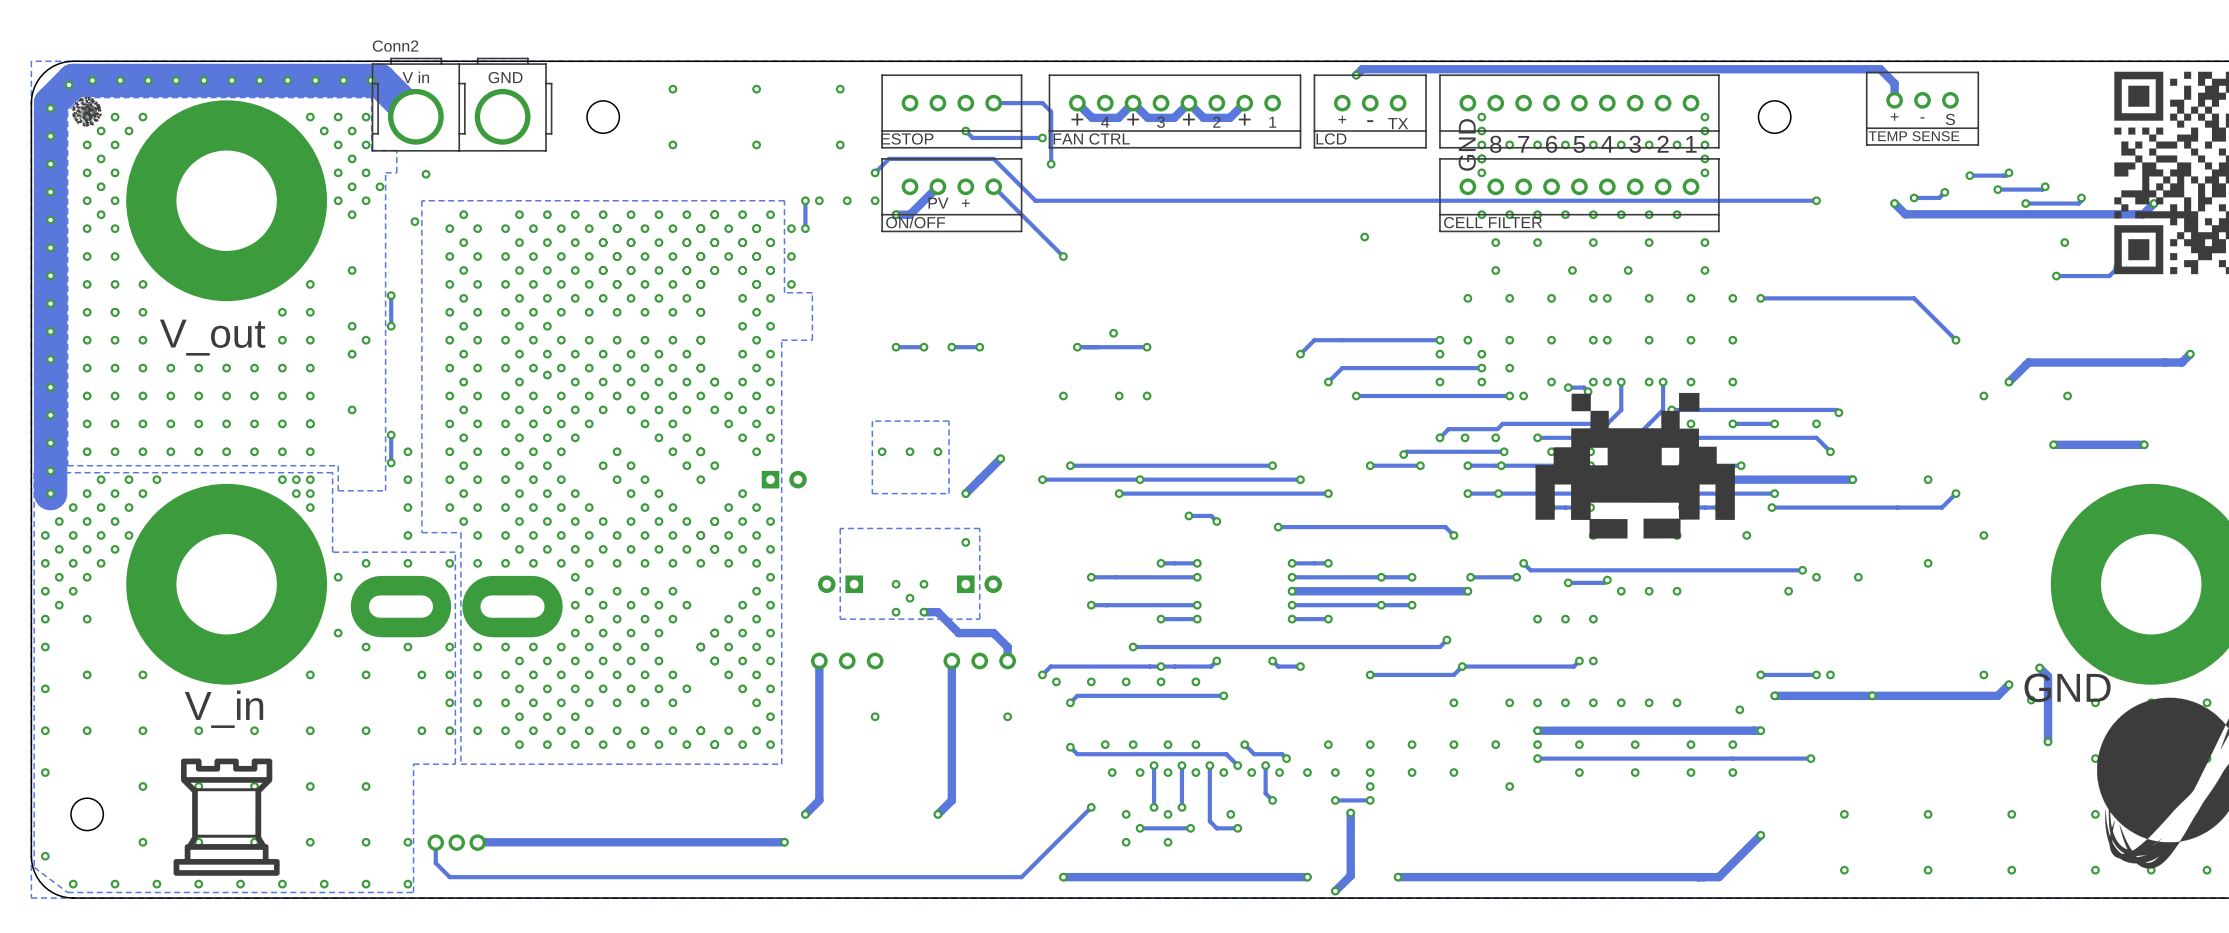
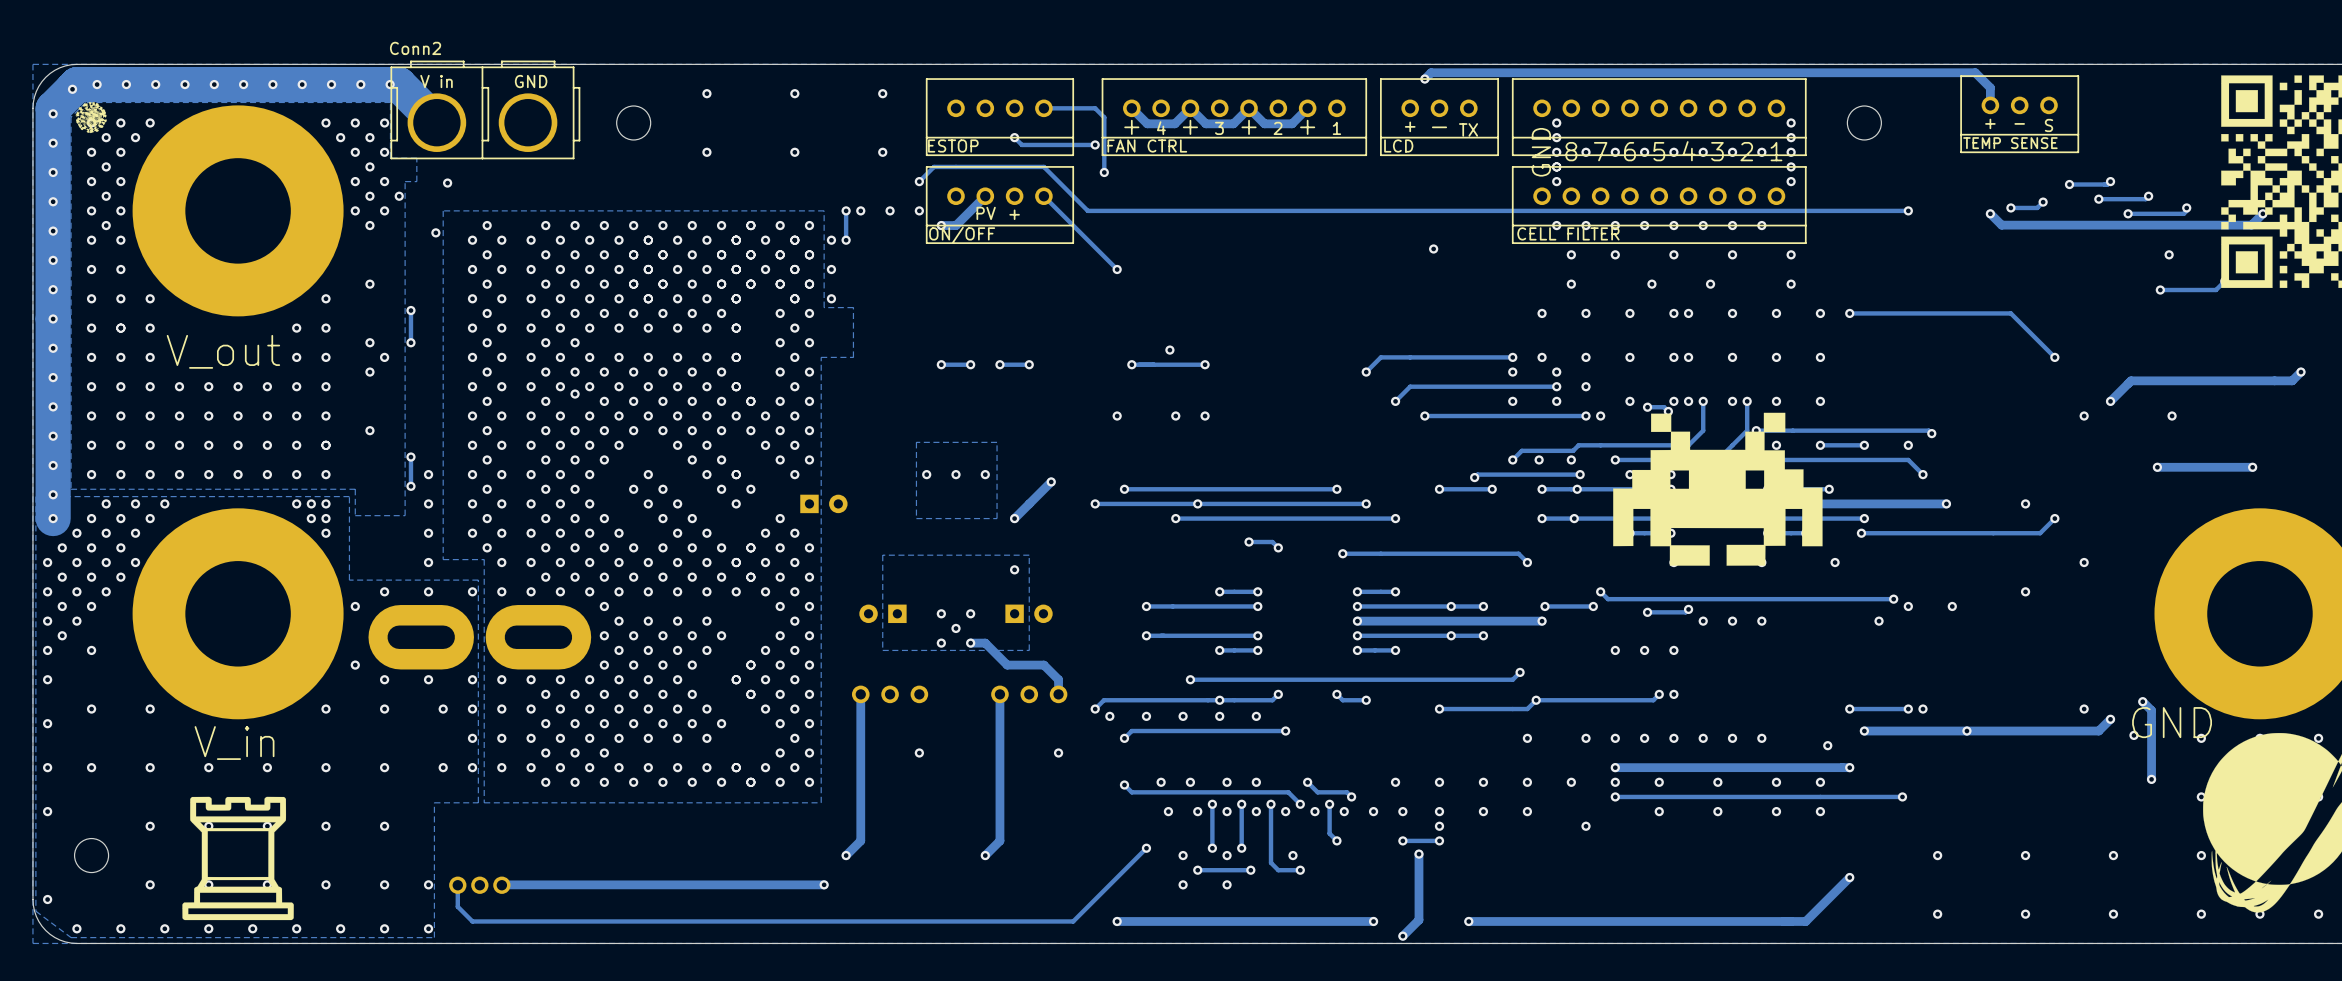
via: none -> (780, 606)
via: none -> (780, 752)

